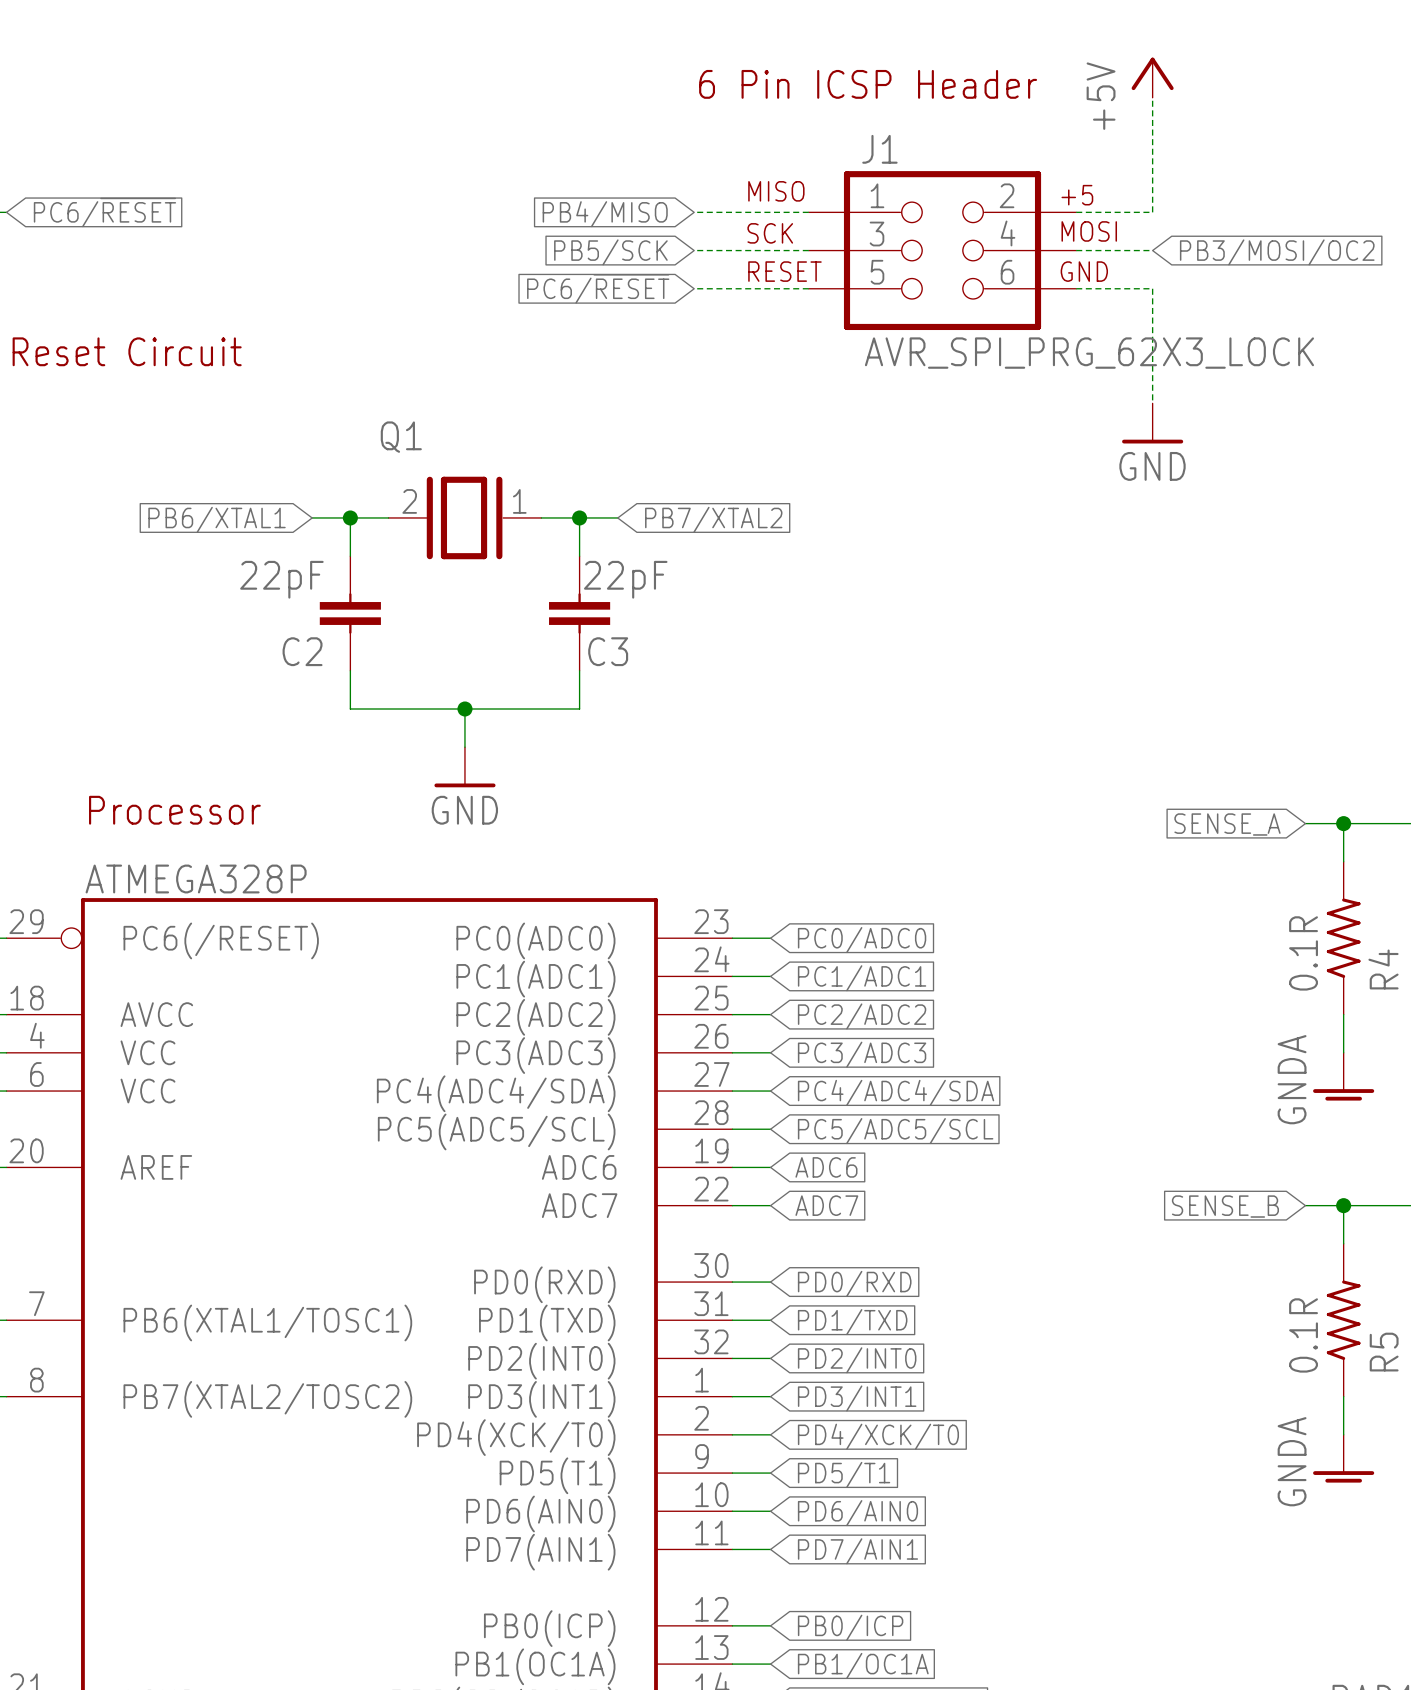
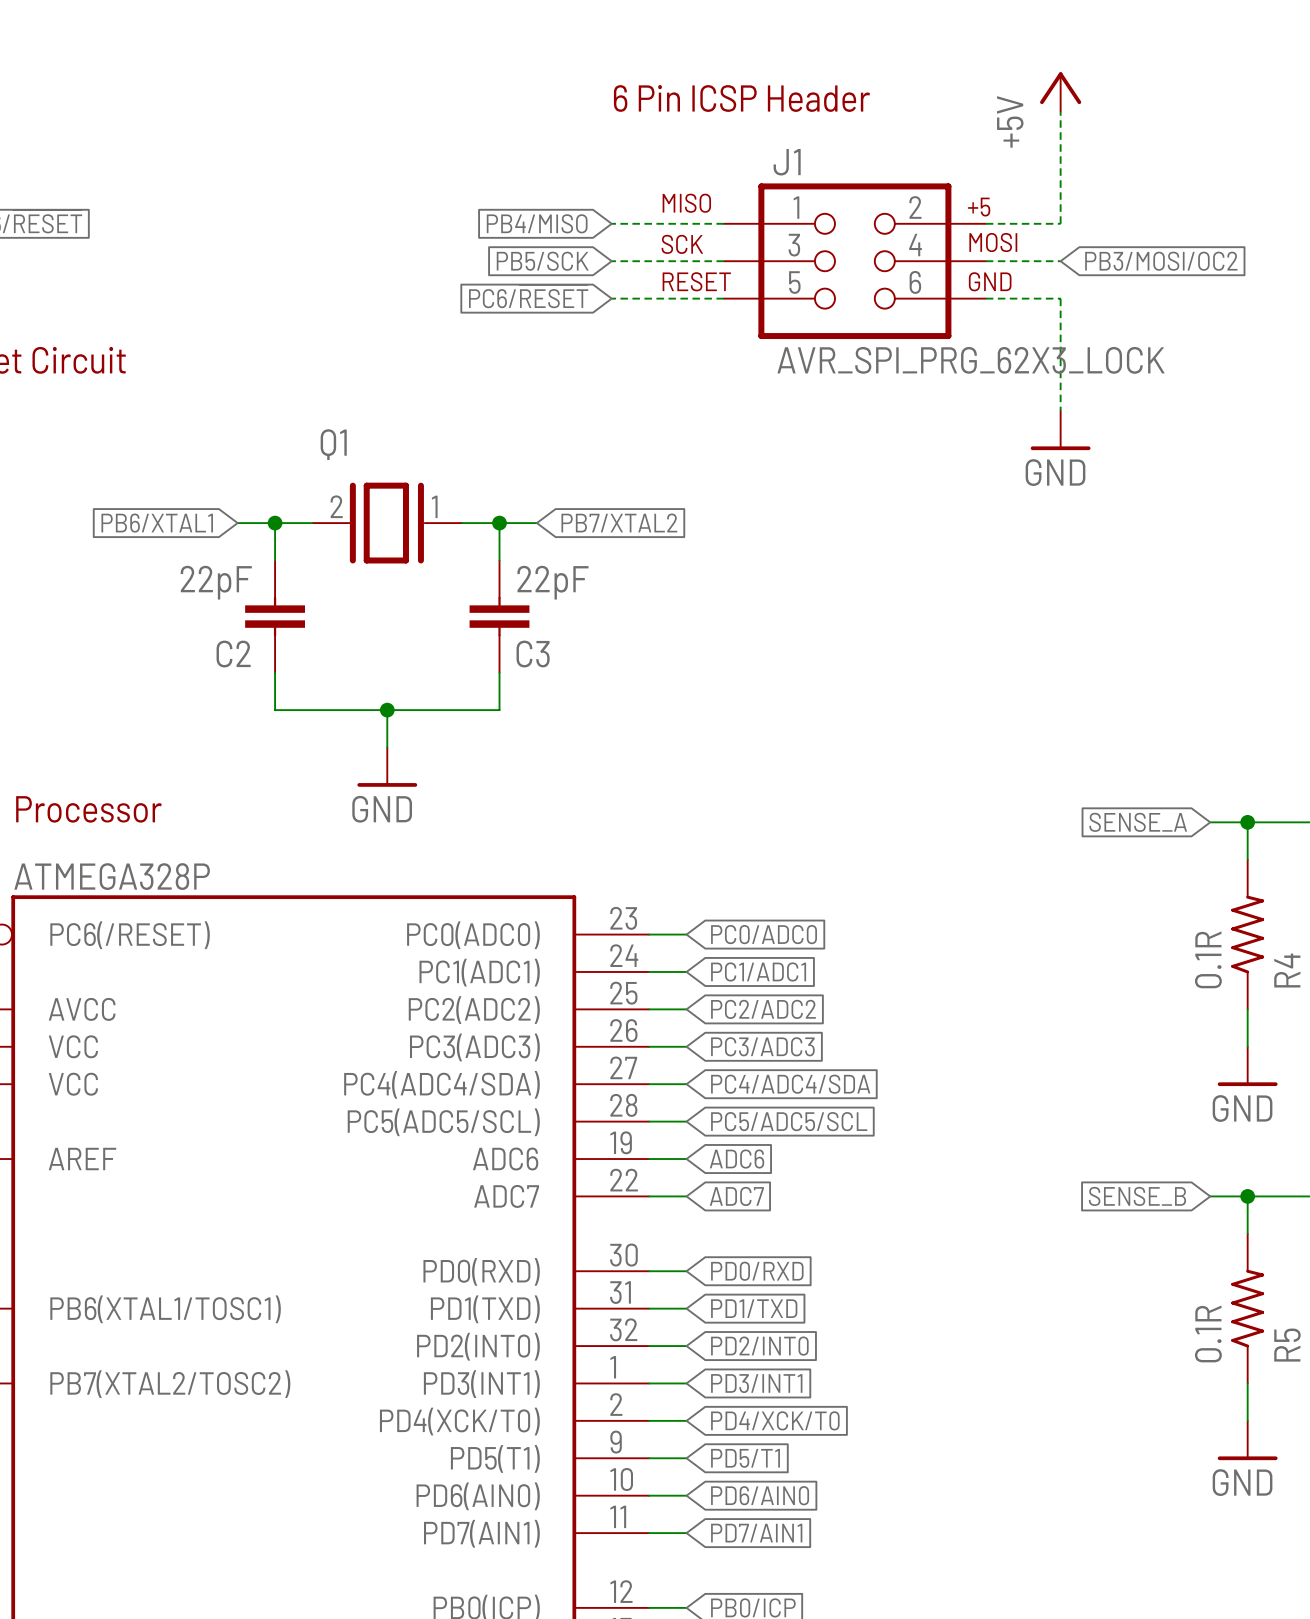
power symbol: GNDA (1343, 1076) -> GND (1247, 1066)
power symbol: GNDA (1343, 1458) -> GND (1247, 1440)

